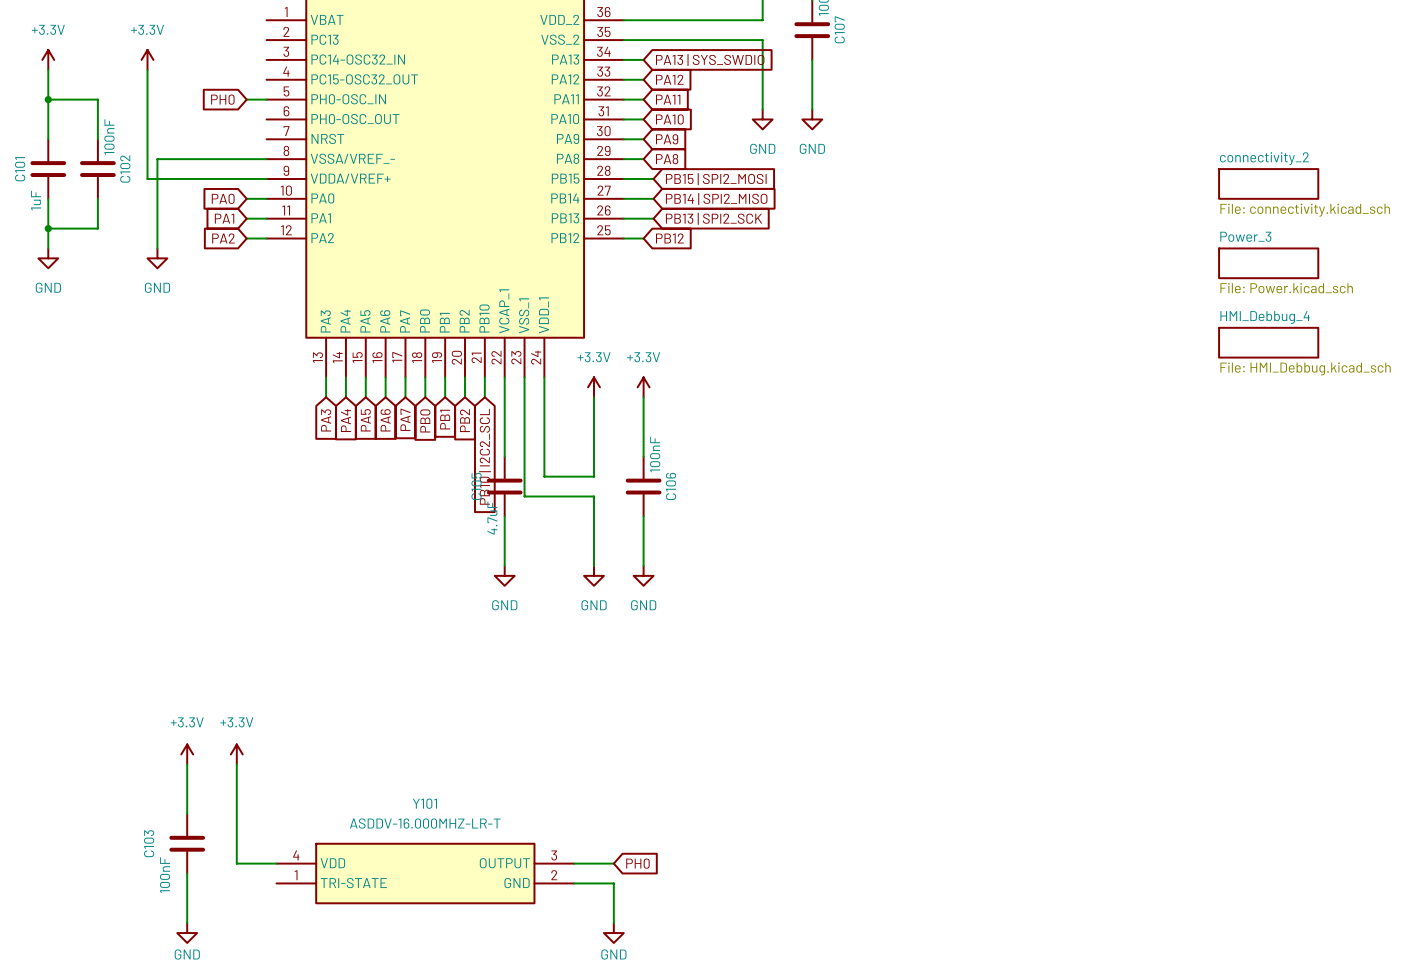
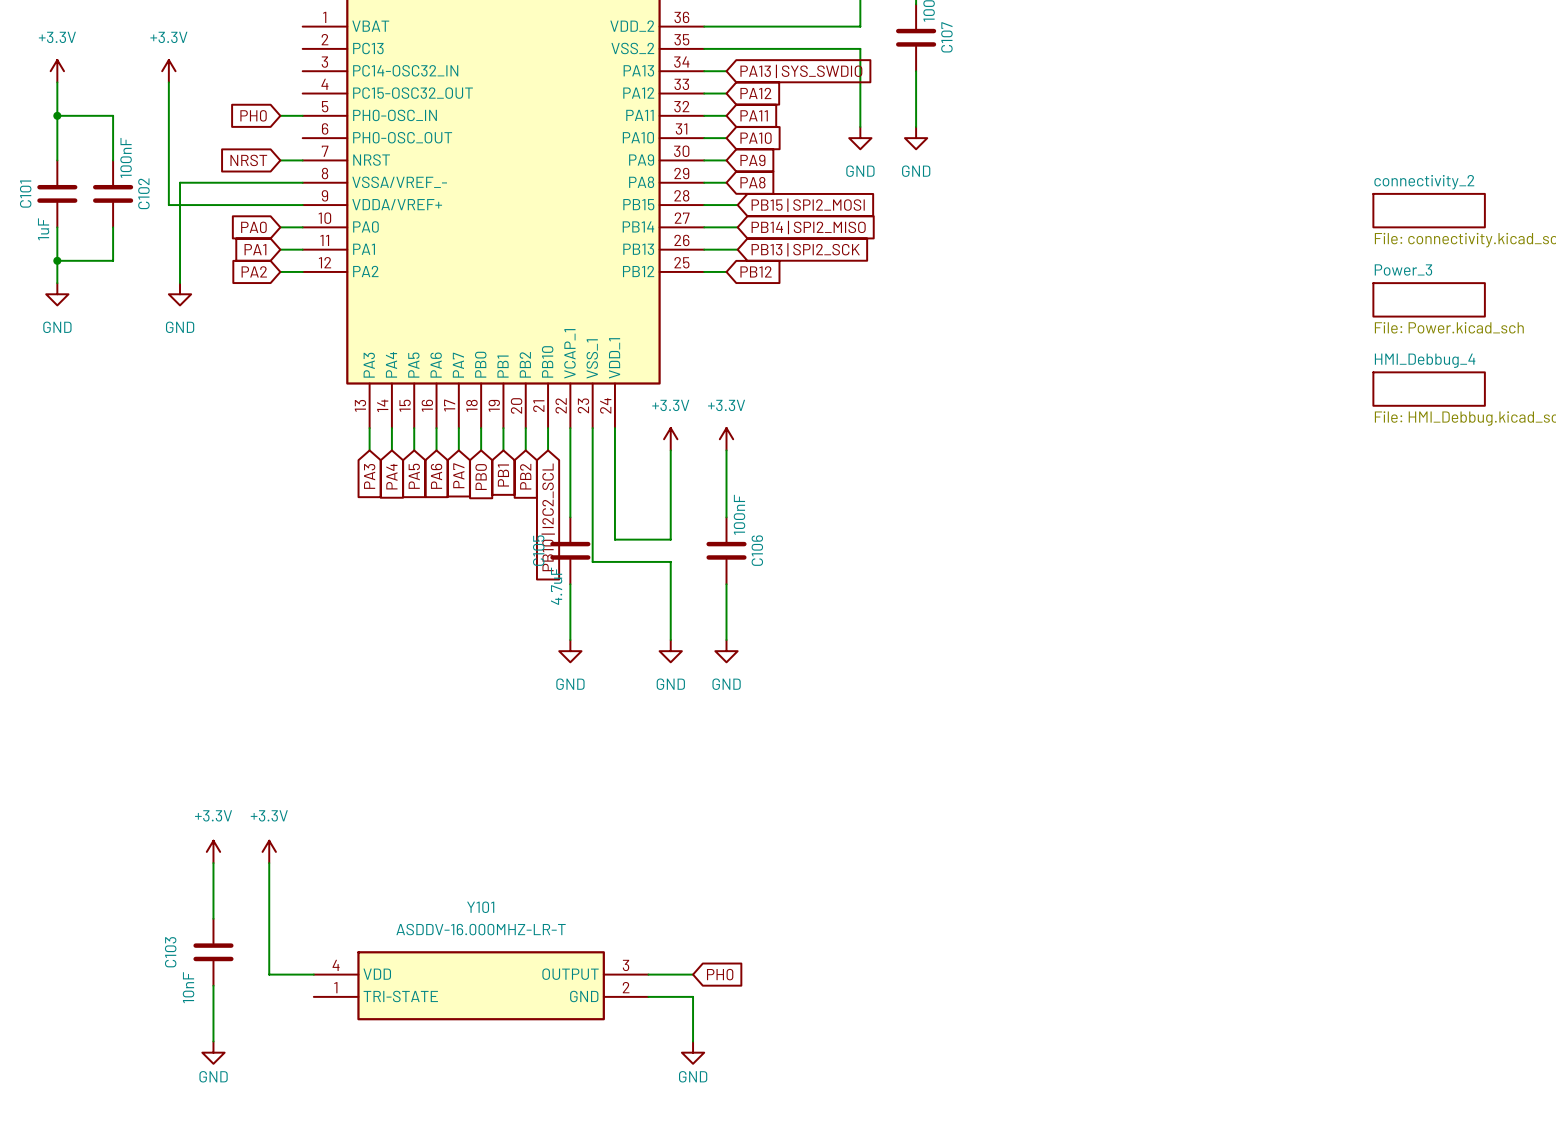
global label: none -> NRST (248, 160)
wire: none -> (280, 160) (302, 160)
C103 value: 100nF (165, 875) -> 10nF (188, 987)

